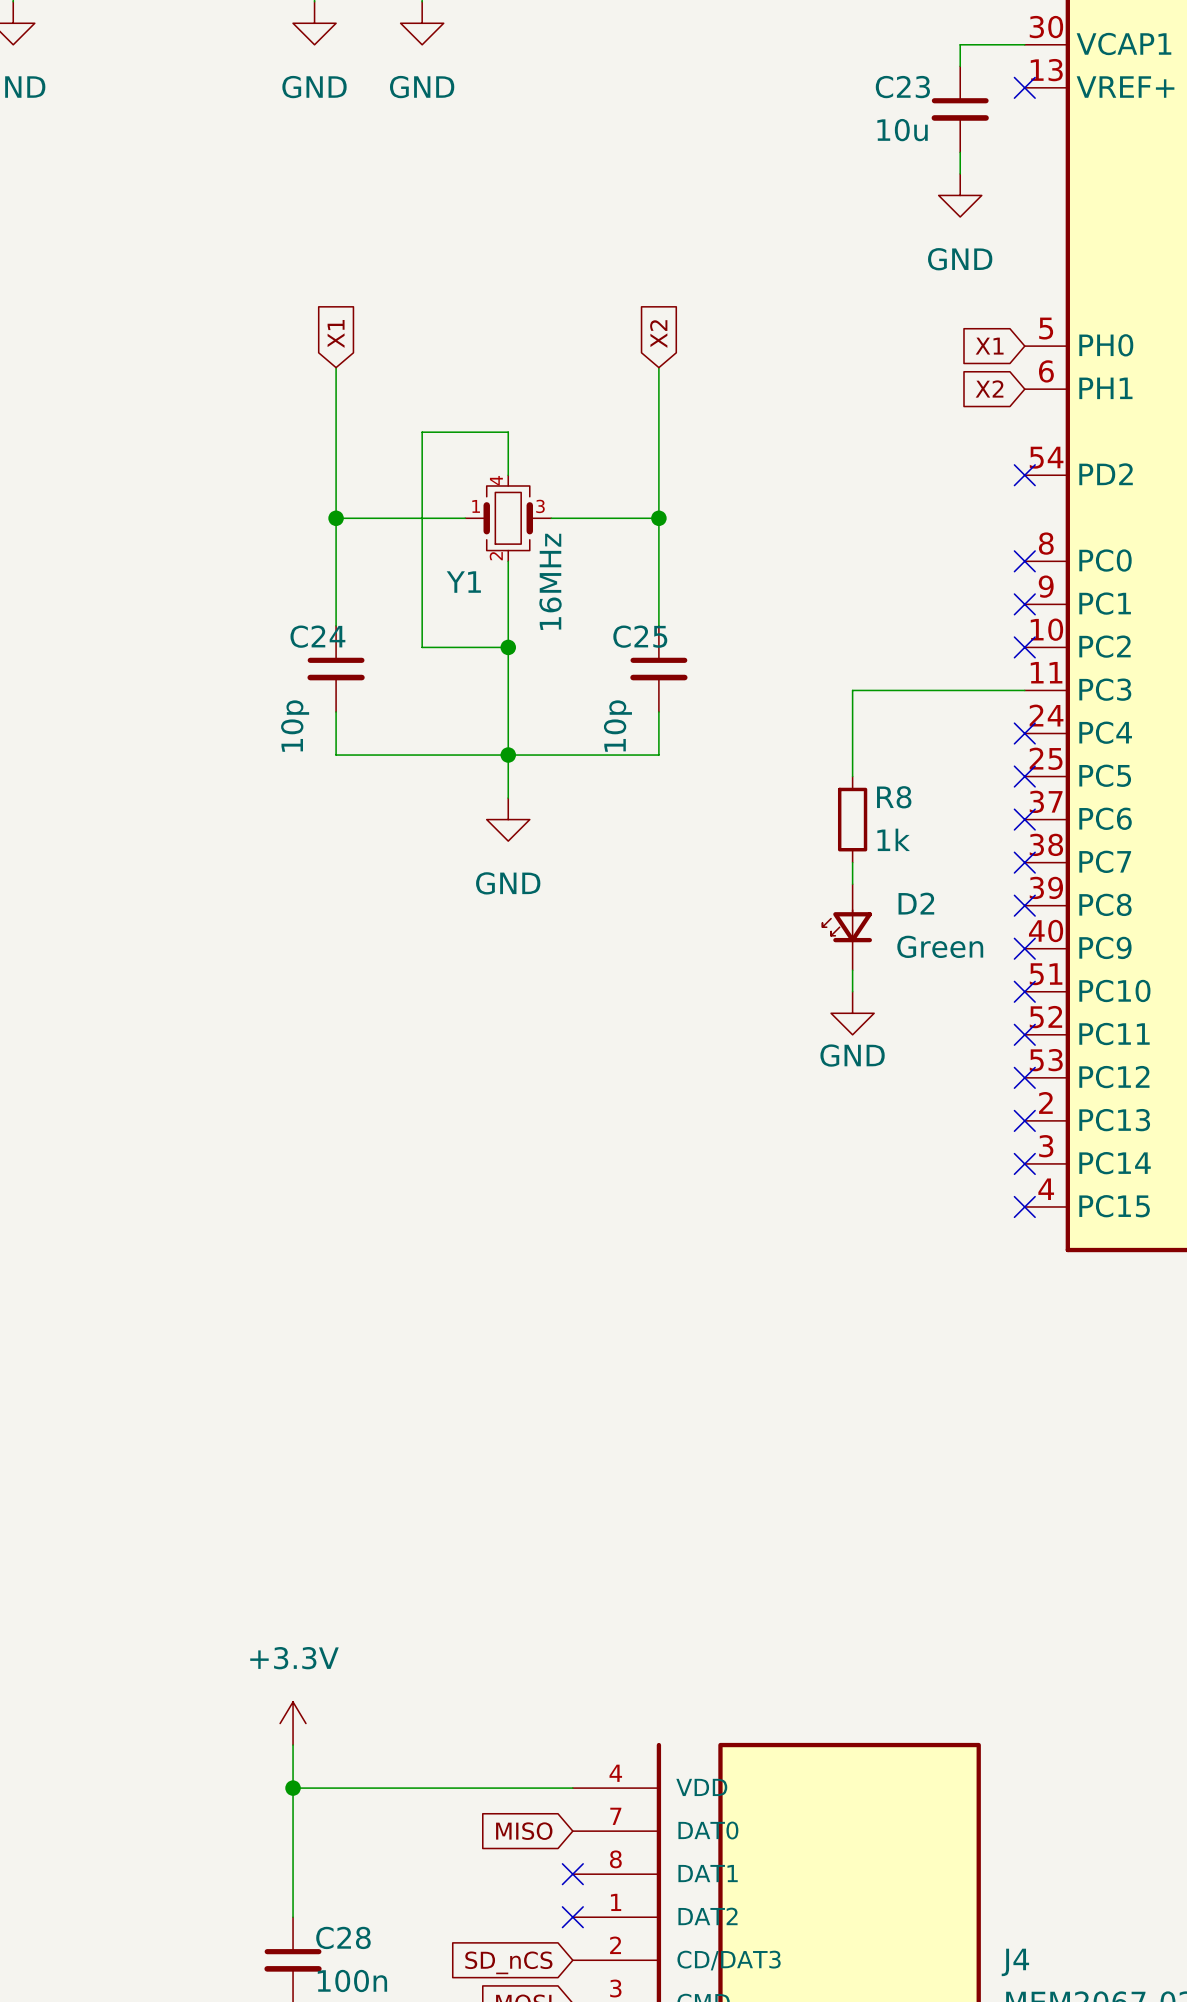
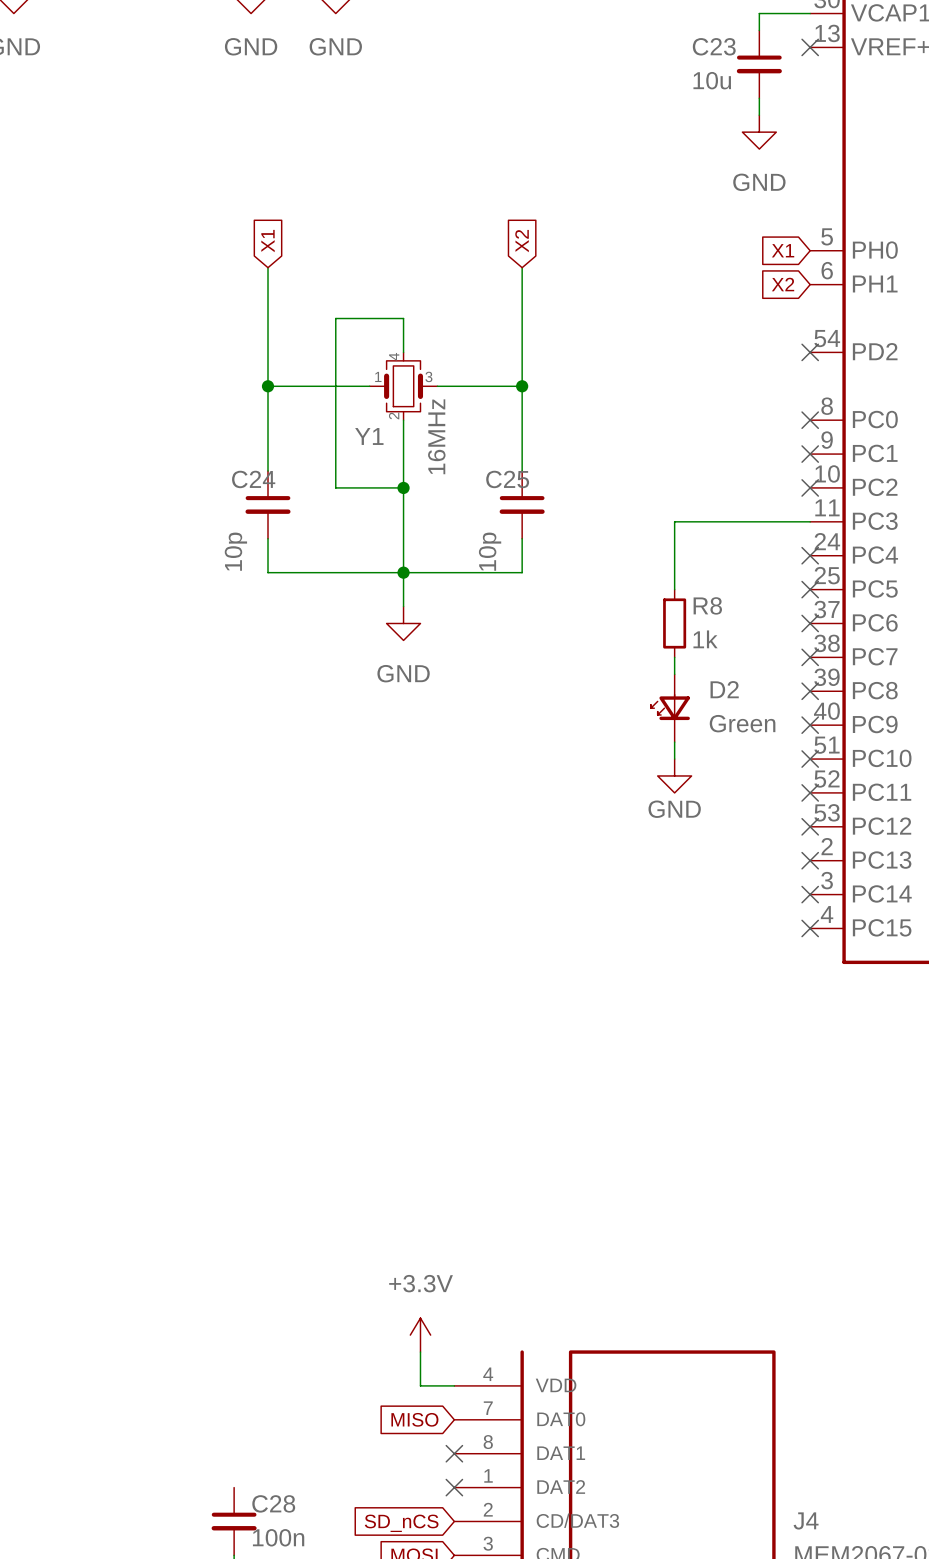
power symbol position: +3.3V (293, 1723) -> +3.3V (420, 1335)
wire: (293, 1745) (293, 1917) -> none
wire: (293, 1788) (529, 1788) -> (420, 1352) (420, 1385)
junction: (293, 1788) -> none

